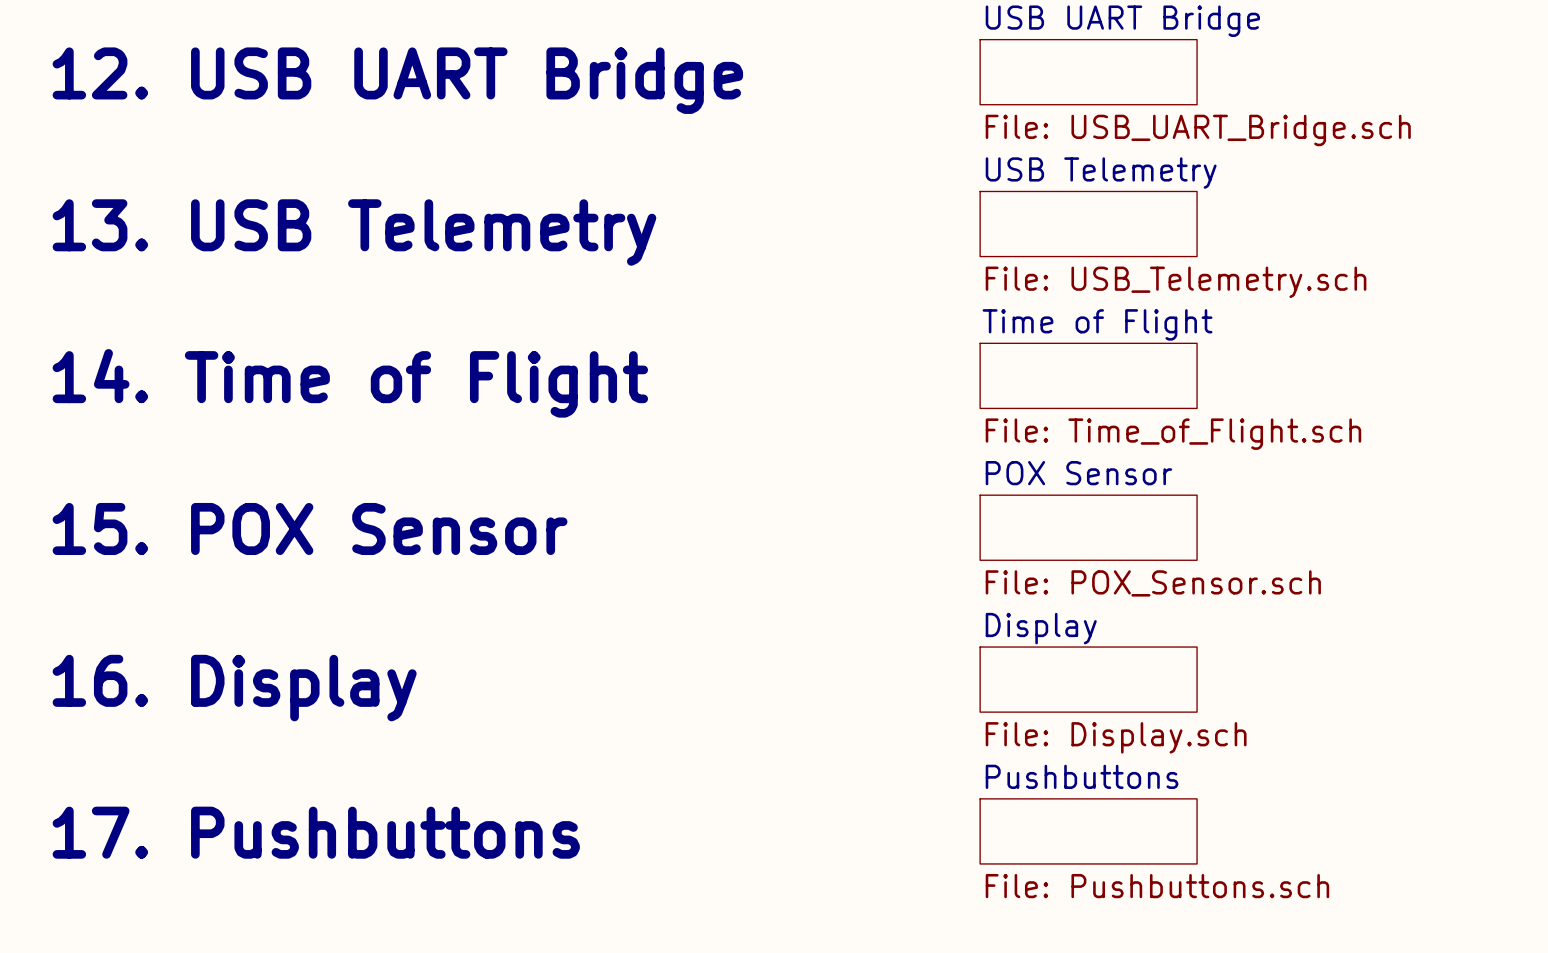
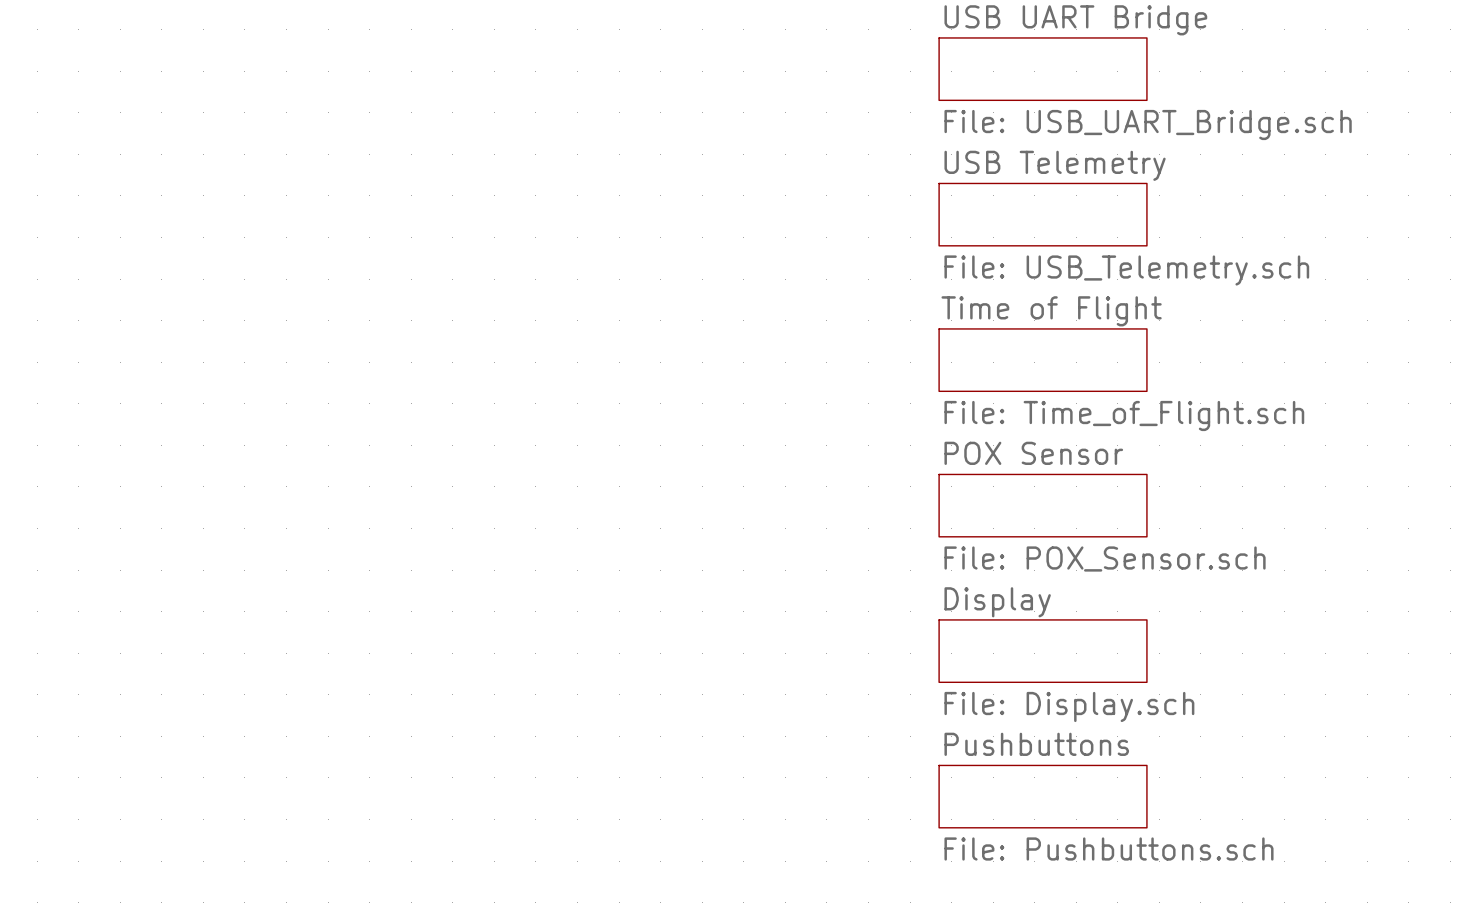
text: 12. USB UART Bridge (397, 80) -> none
text: 13. USB Telemetry (354, 232) -> none
text: 14. Time of Flight (350, 383) -> none
text: 15. POX Sensor (310, 528) -> none
text: 16. Display (234, 688) -> none
text: 17. Pushbuttons (316, 832) -> none

